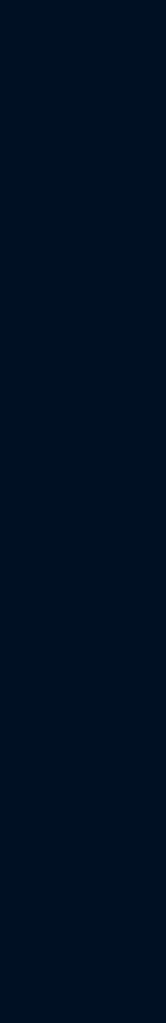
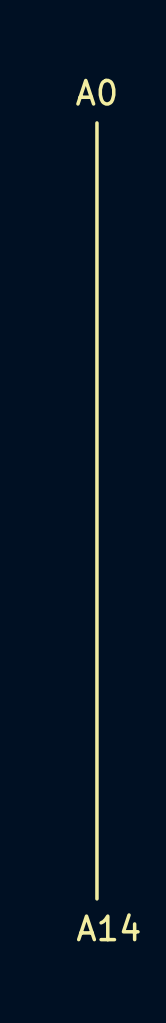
text: none -> A0 (95, 92)
line: none -> (96, 122) (96, 898)
text: none -> A14 (108, 927)

